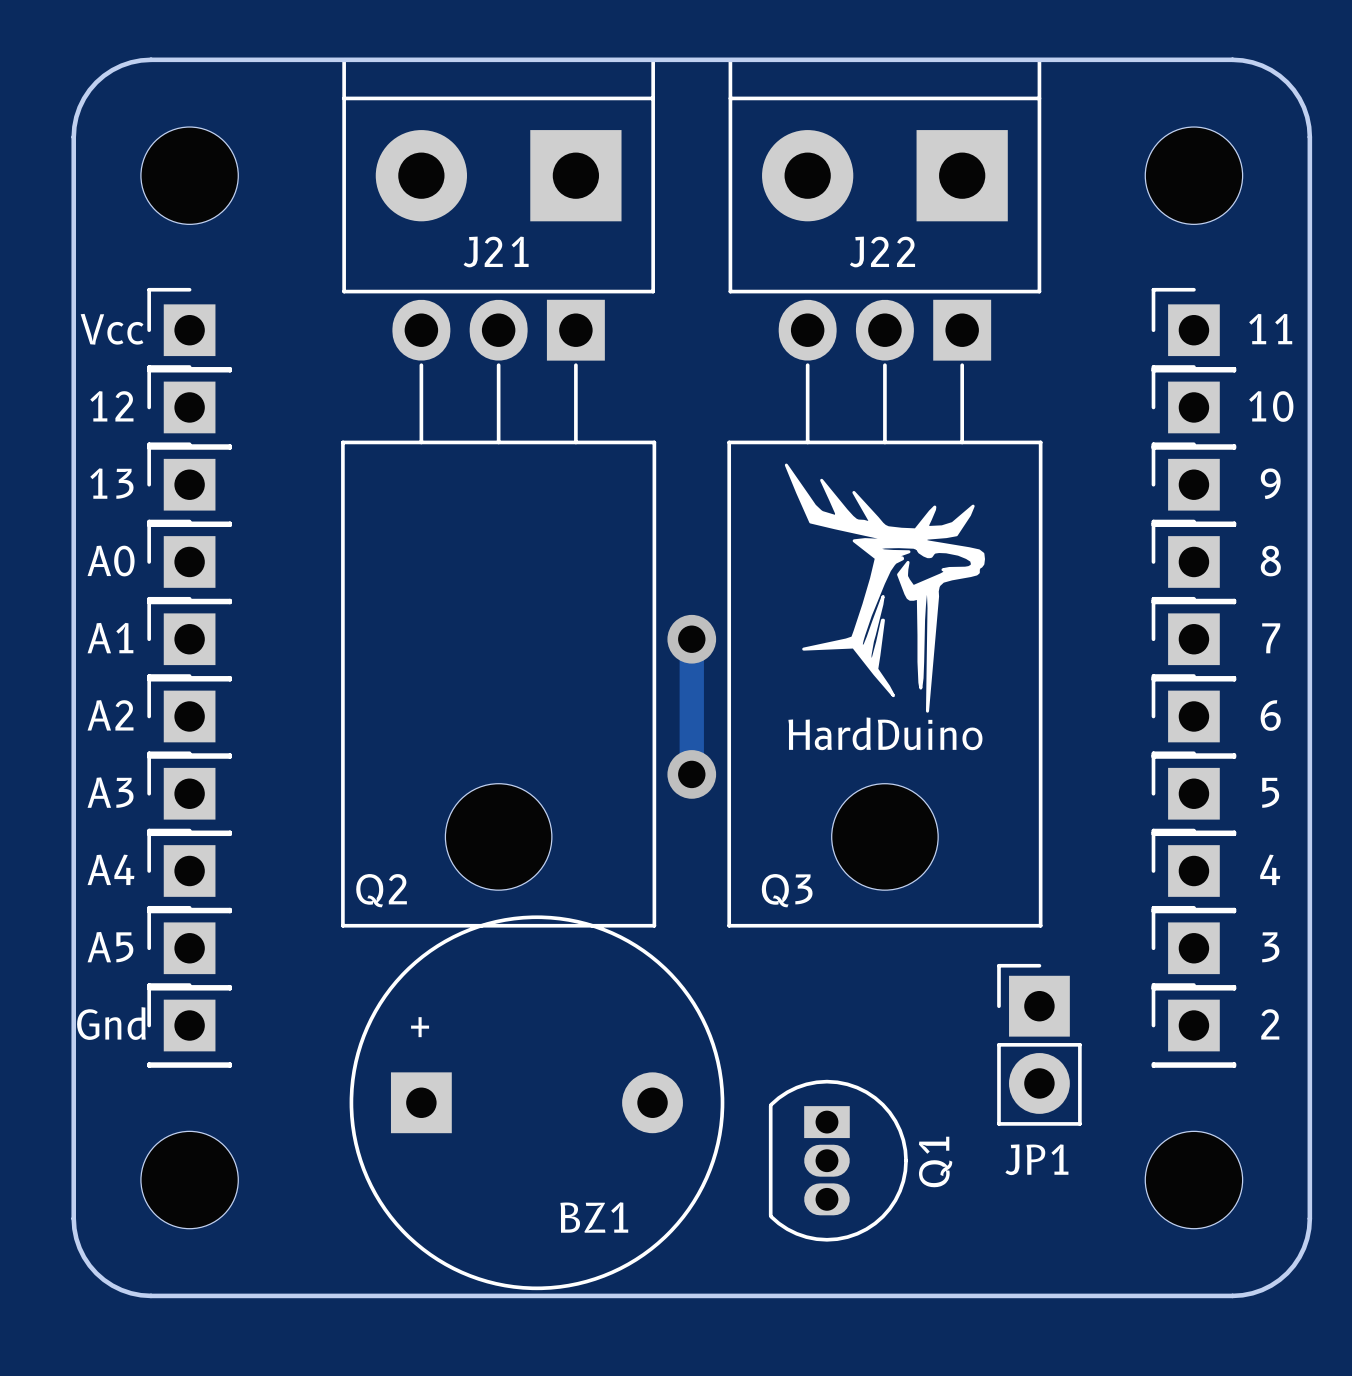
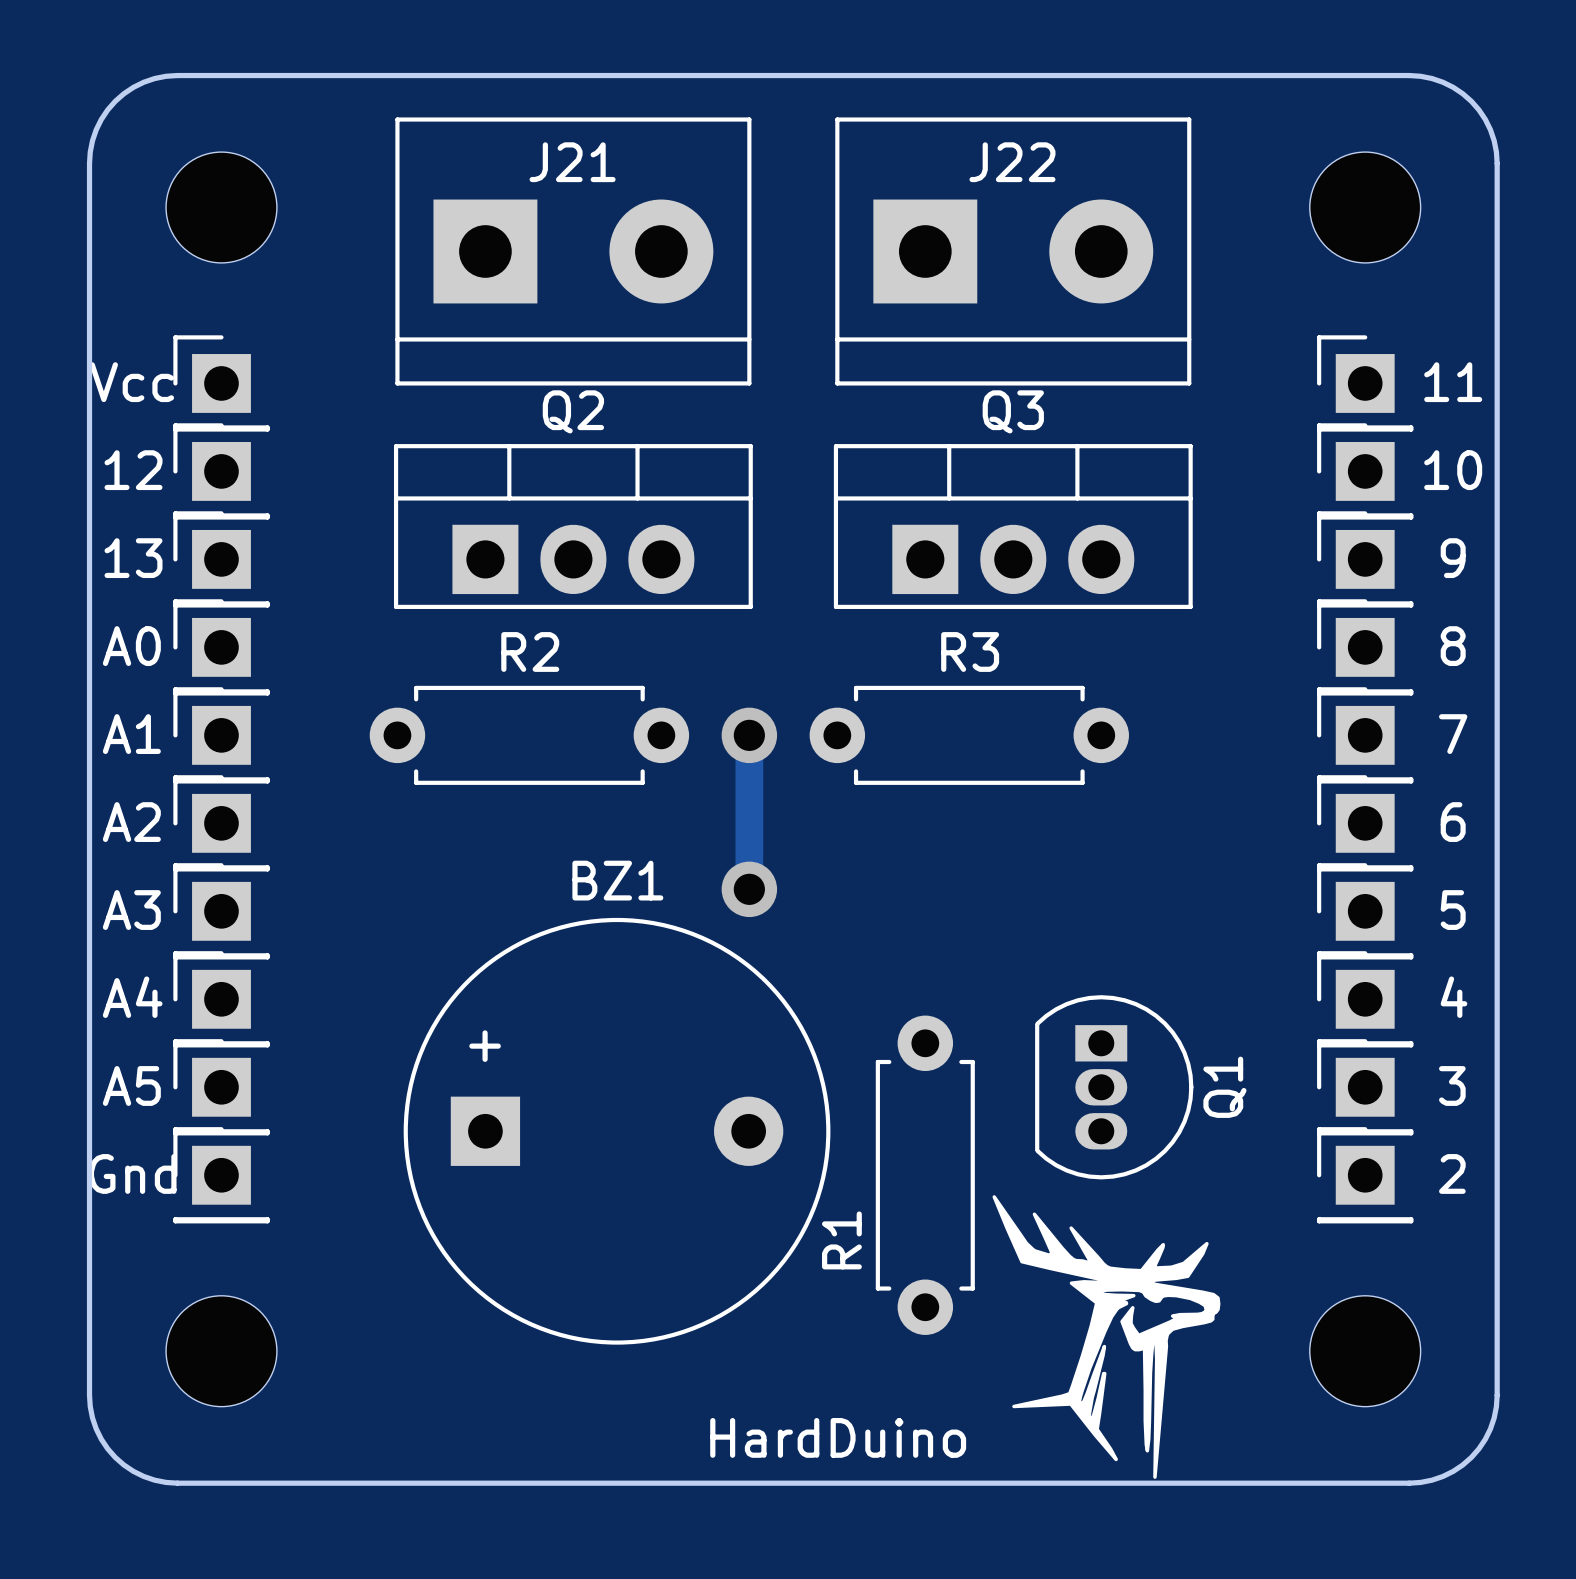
J21 rotation: 0° (498, 175) -> 180° (573, 251)
J22 rotation: 0° (884, 175) -> 180° (1013, 251)
Q2 footprint: [341, 299, 657, 928] -> [393, 444, 753, 609]
Q3 footprint: [727, 299, 1043, 928] -> [833, 444, 1193, 609]
drawing position: (884, 588) -> (1106, 1337)
R2: none -> (529, 735)
track: (691, 639) (691, 774) -> (749, 735) (749, 889)
via position: (691, 639) -> (749, 735)
R3: none -> (969, 735)
text position: HardDuino (885, 733) -> HardDuino (838, 1437)
via position: (691, 774) -> (749, 889)
Q2 name position: Q2 (381, 890) -> Q2 (573, 411)
Q3 name position: Q3 (787, 890) -> Q3 (1013, 411)
R1: none -> (925, 1175)
JP1: (1039, 1044) -> none
BZ1 position: (536, 1102) -> (617, 1131)
Q1 position: (838, 1160) -> (1114, 1087)
BZ1 name position: BZ1 (594, 1217) -> BZ1 (617, 880)

